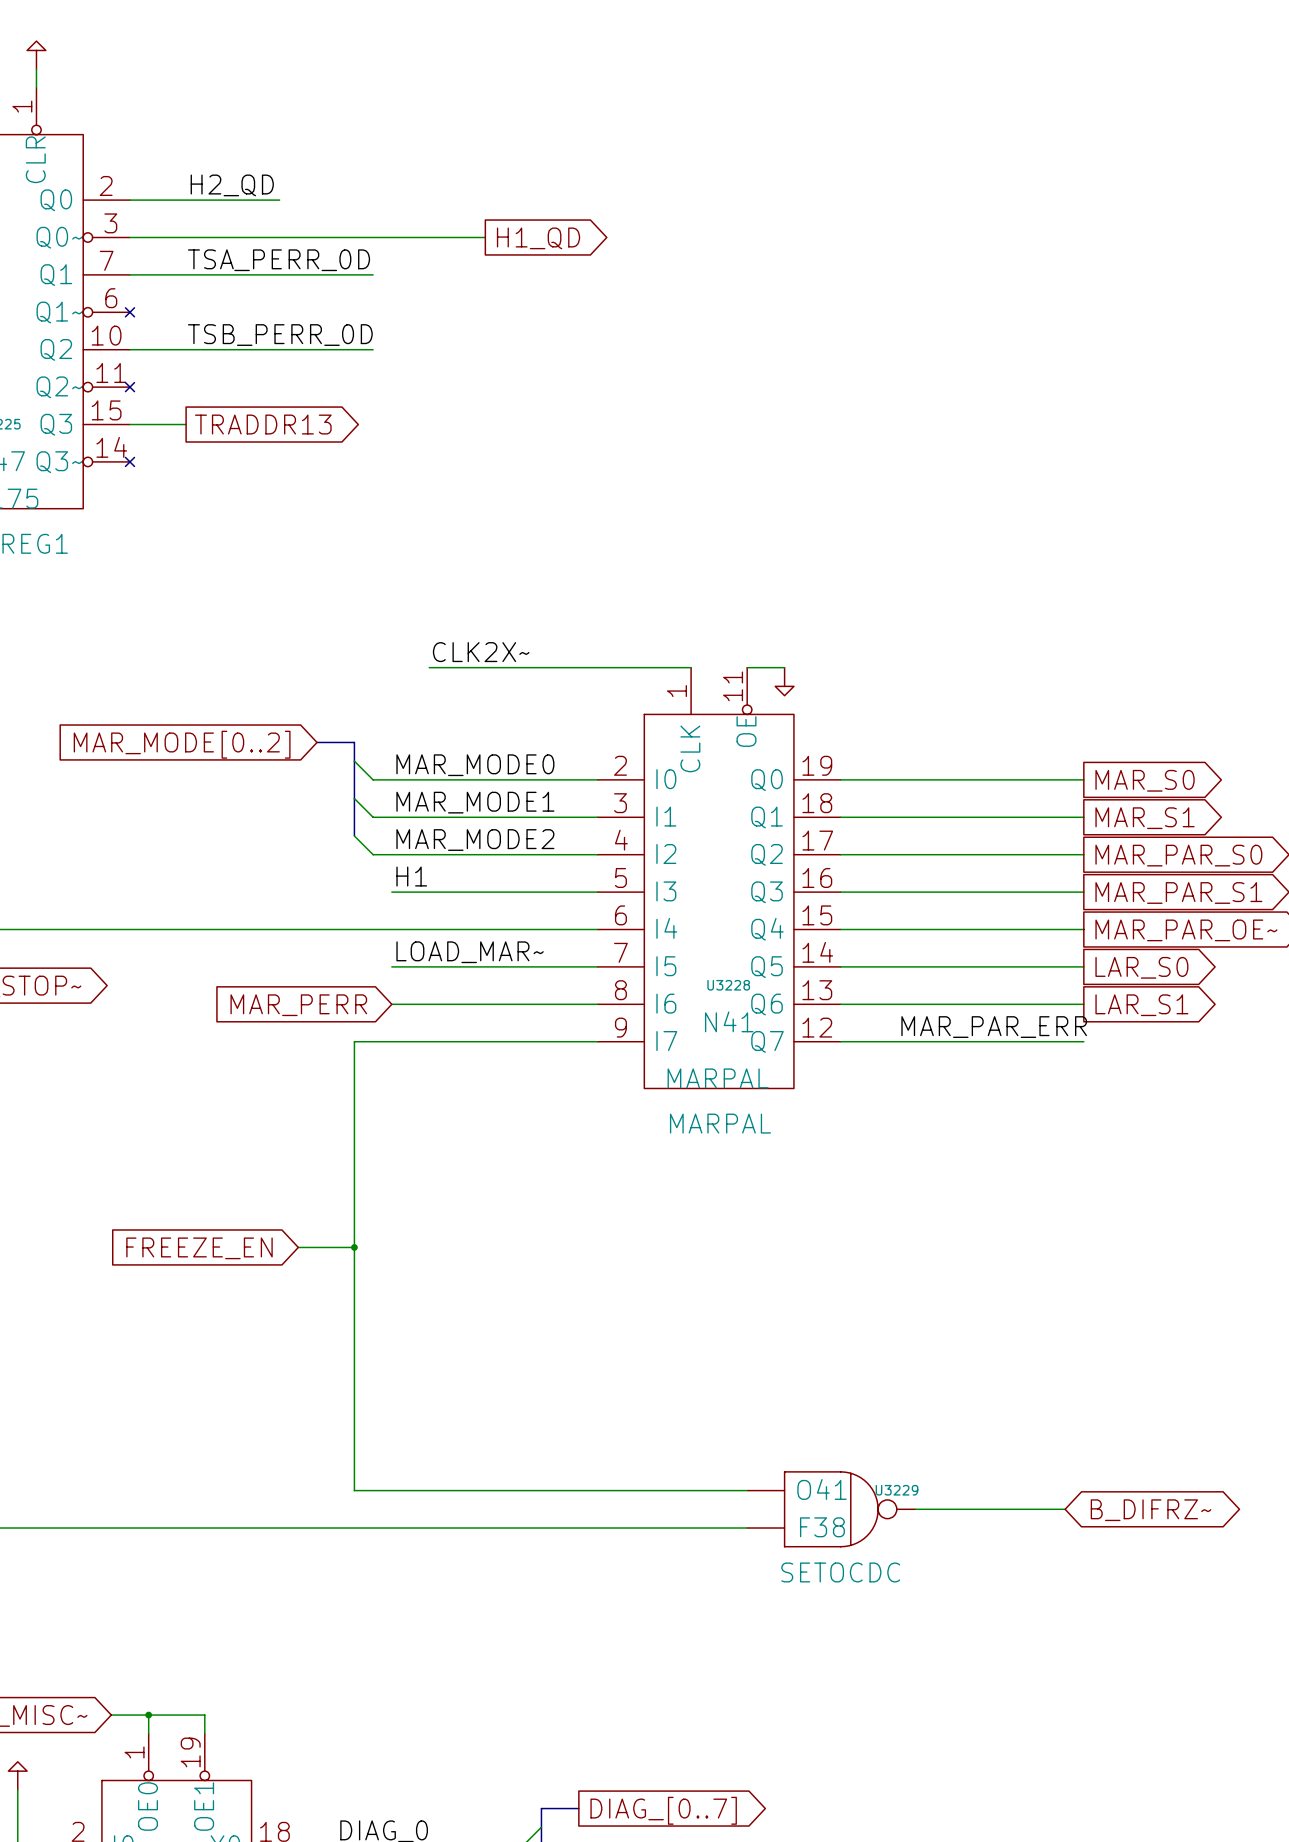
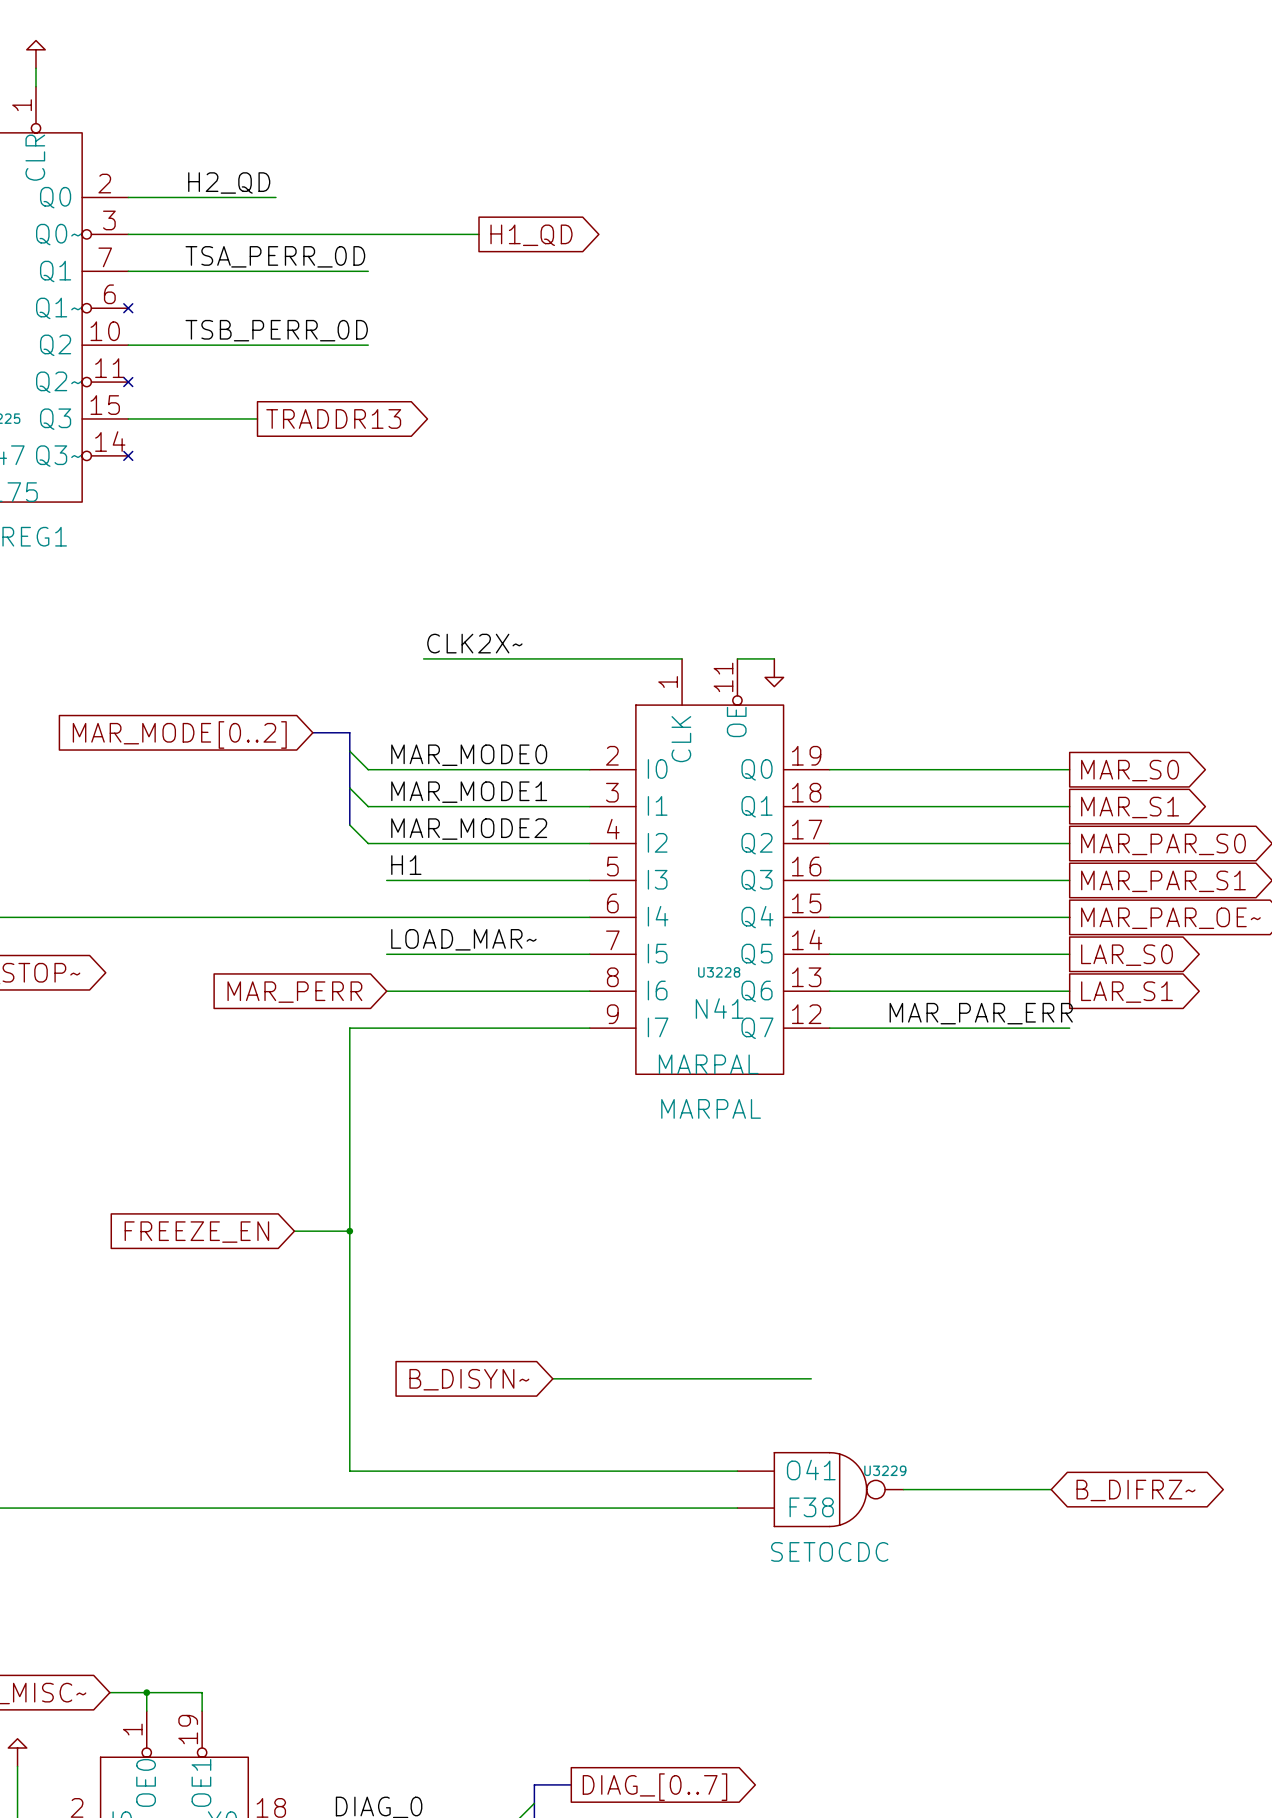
wire: none -> (183, 418) (257, 418)
global label position: TRADDR13 (263, 424) -> TRADDR13 (333, 418)
global label: none -> B_DISYN~ (469, 1379)
wire: none -> (552, 1378) (811, 1378)

